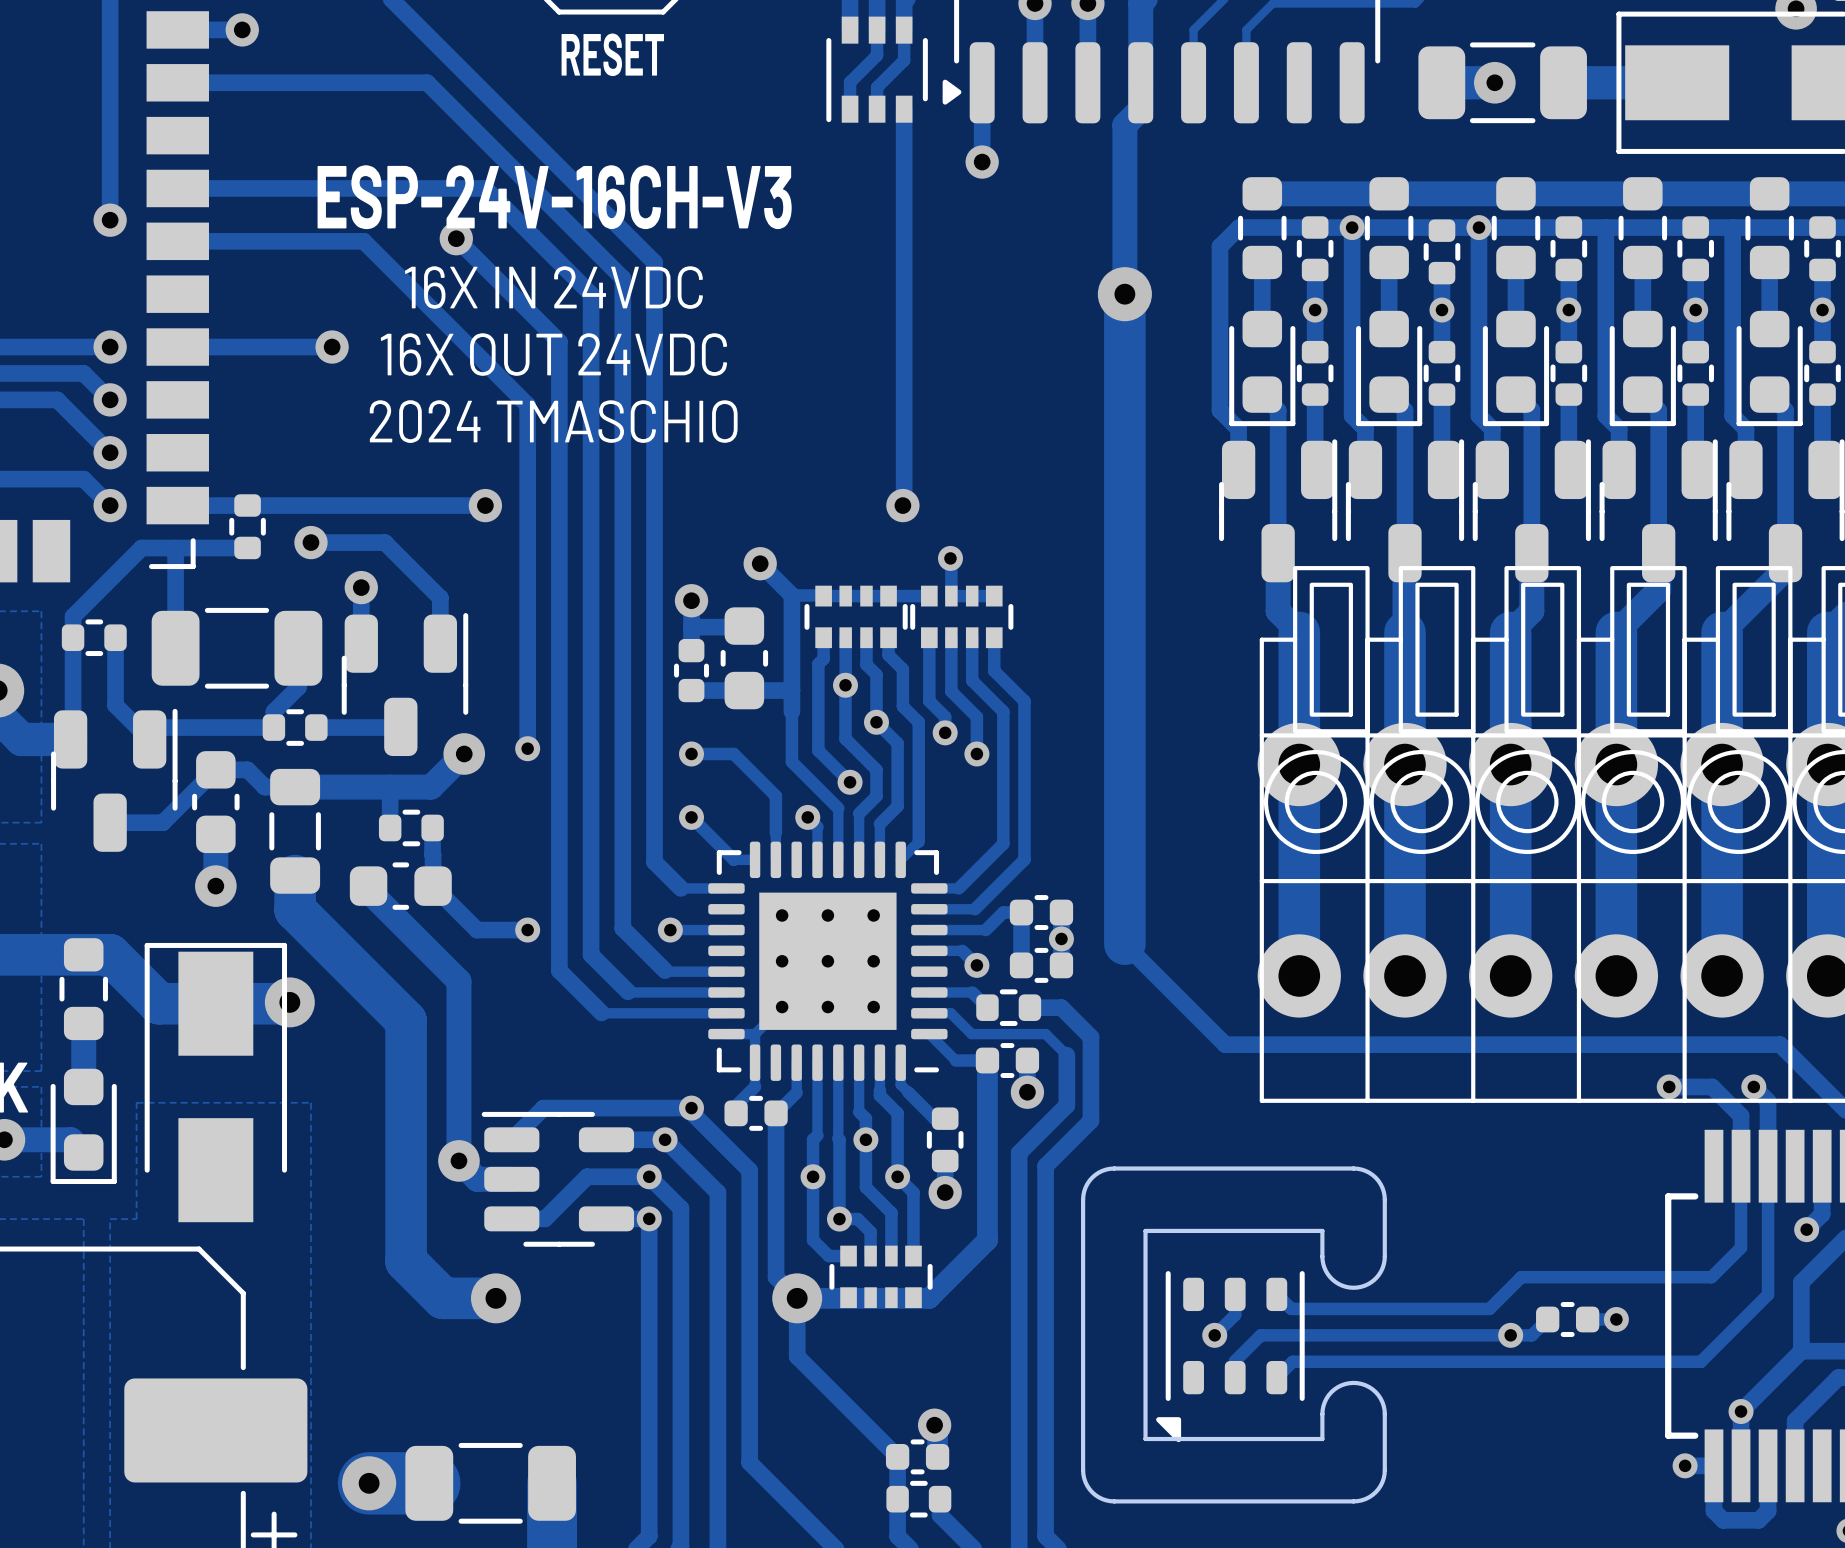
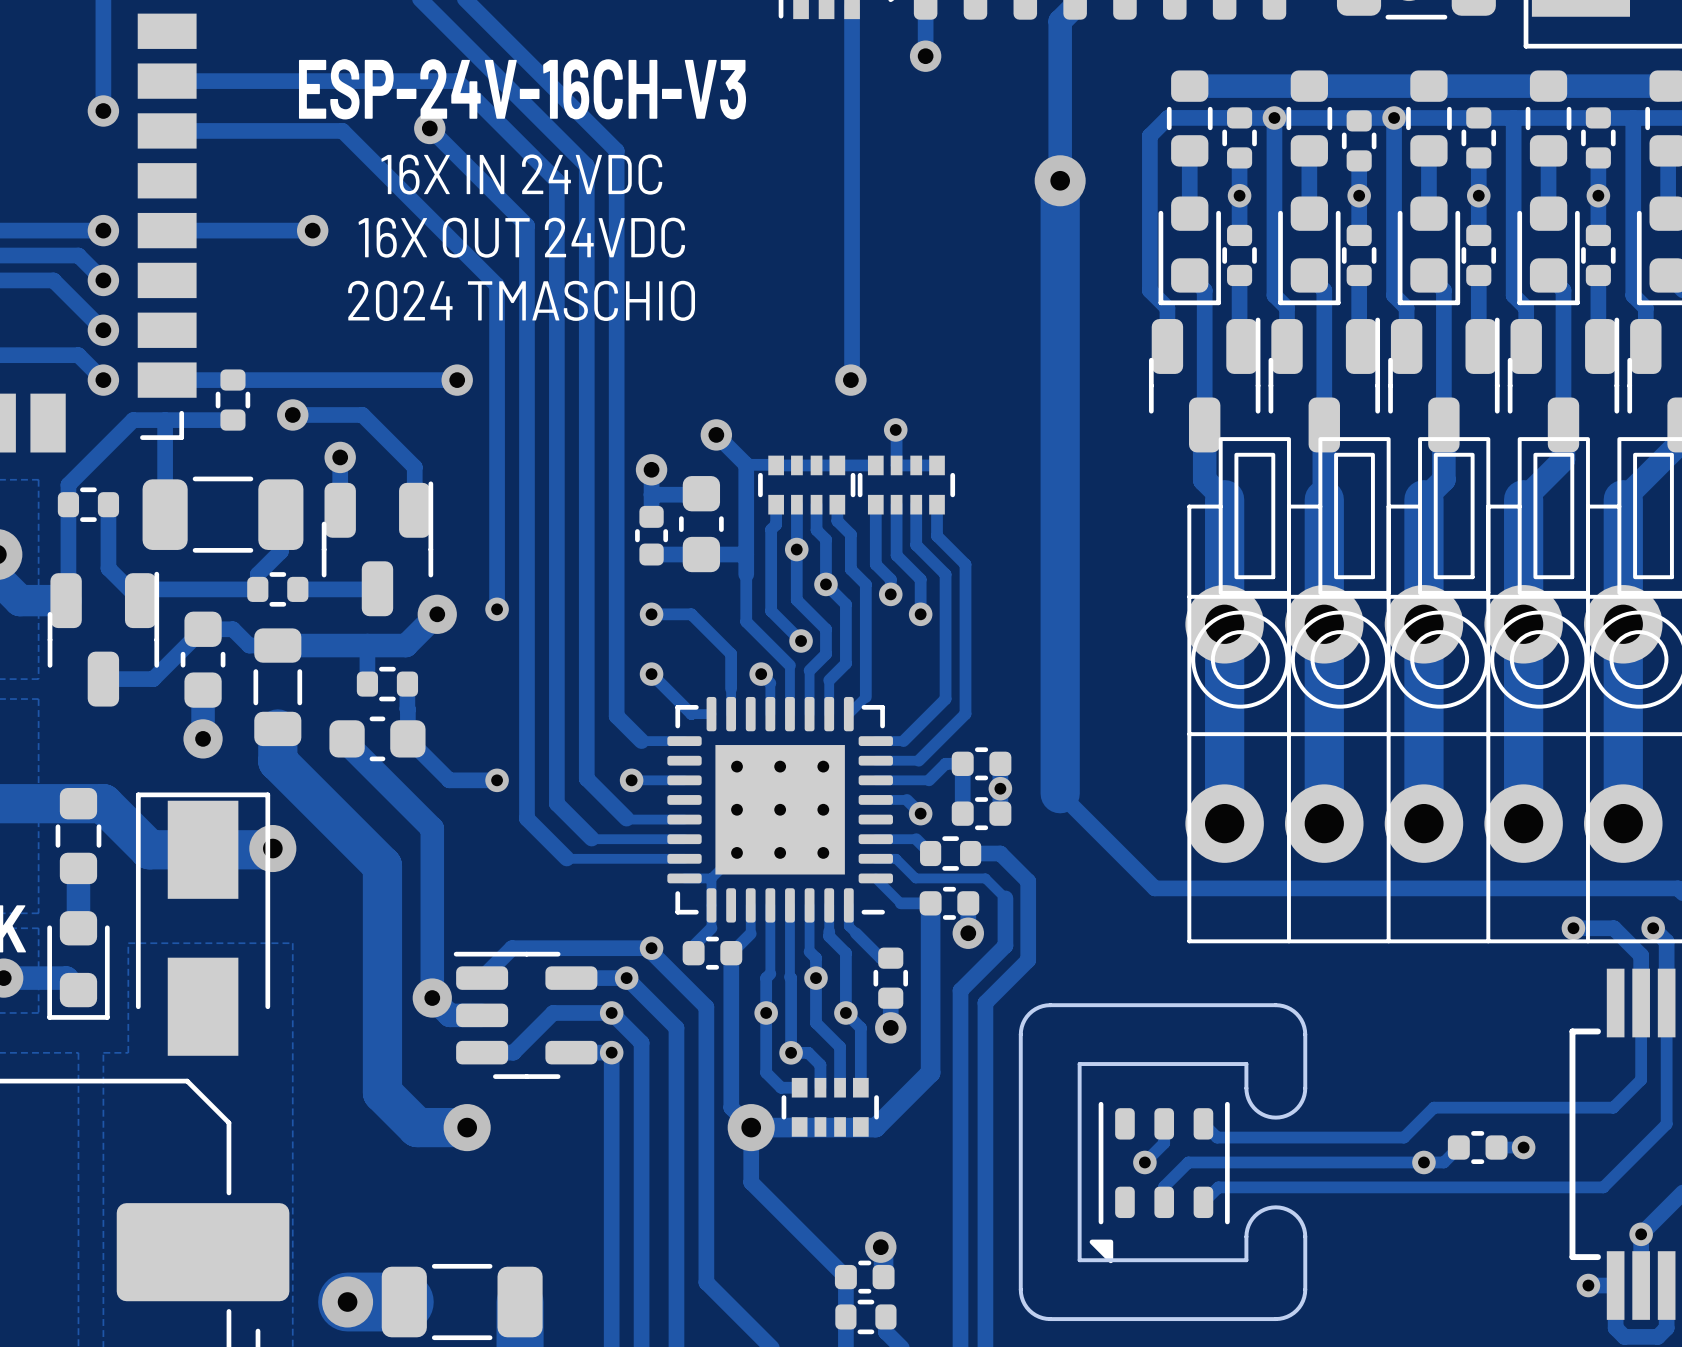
part footprint: [341, 613, 469, 757] -> [321, 481, 434, 617]
part footprint: [51, 708, 178, 852] -> [47, 571, 160, 707]

